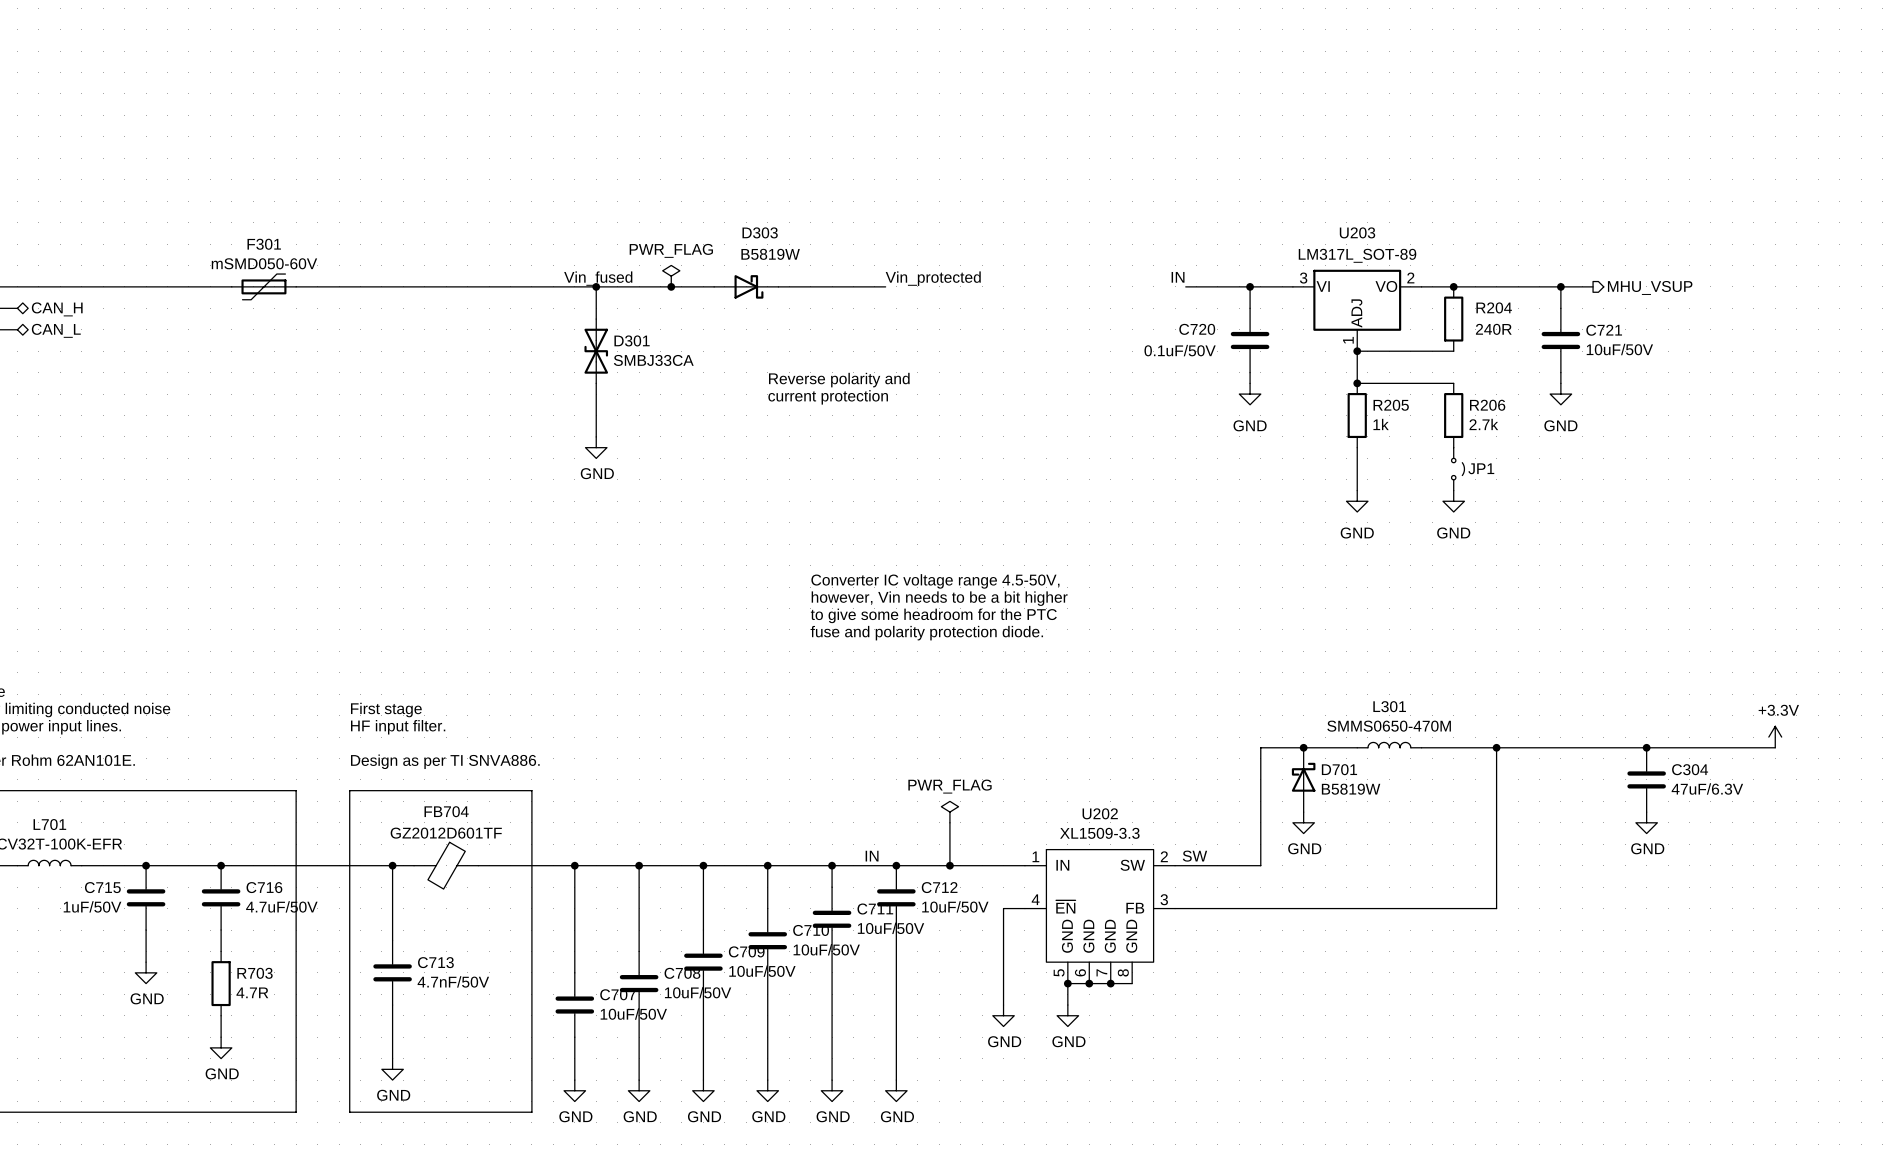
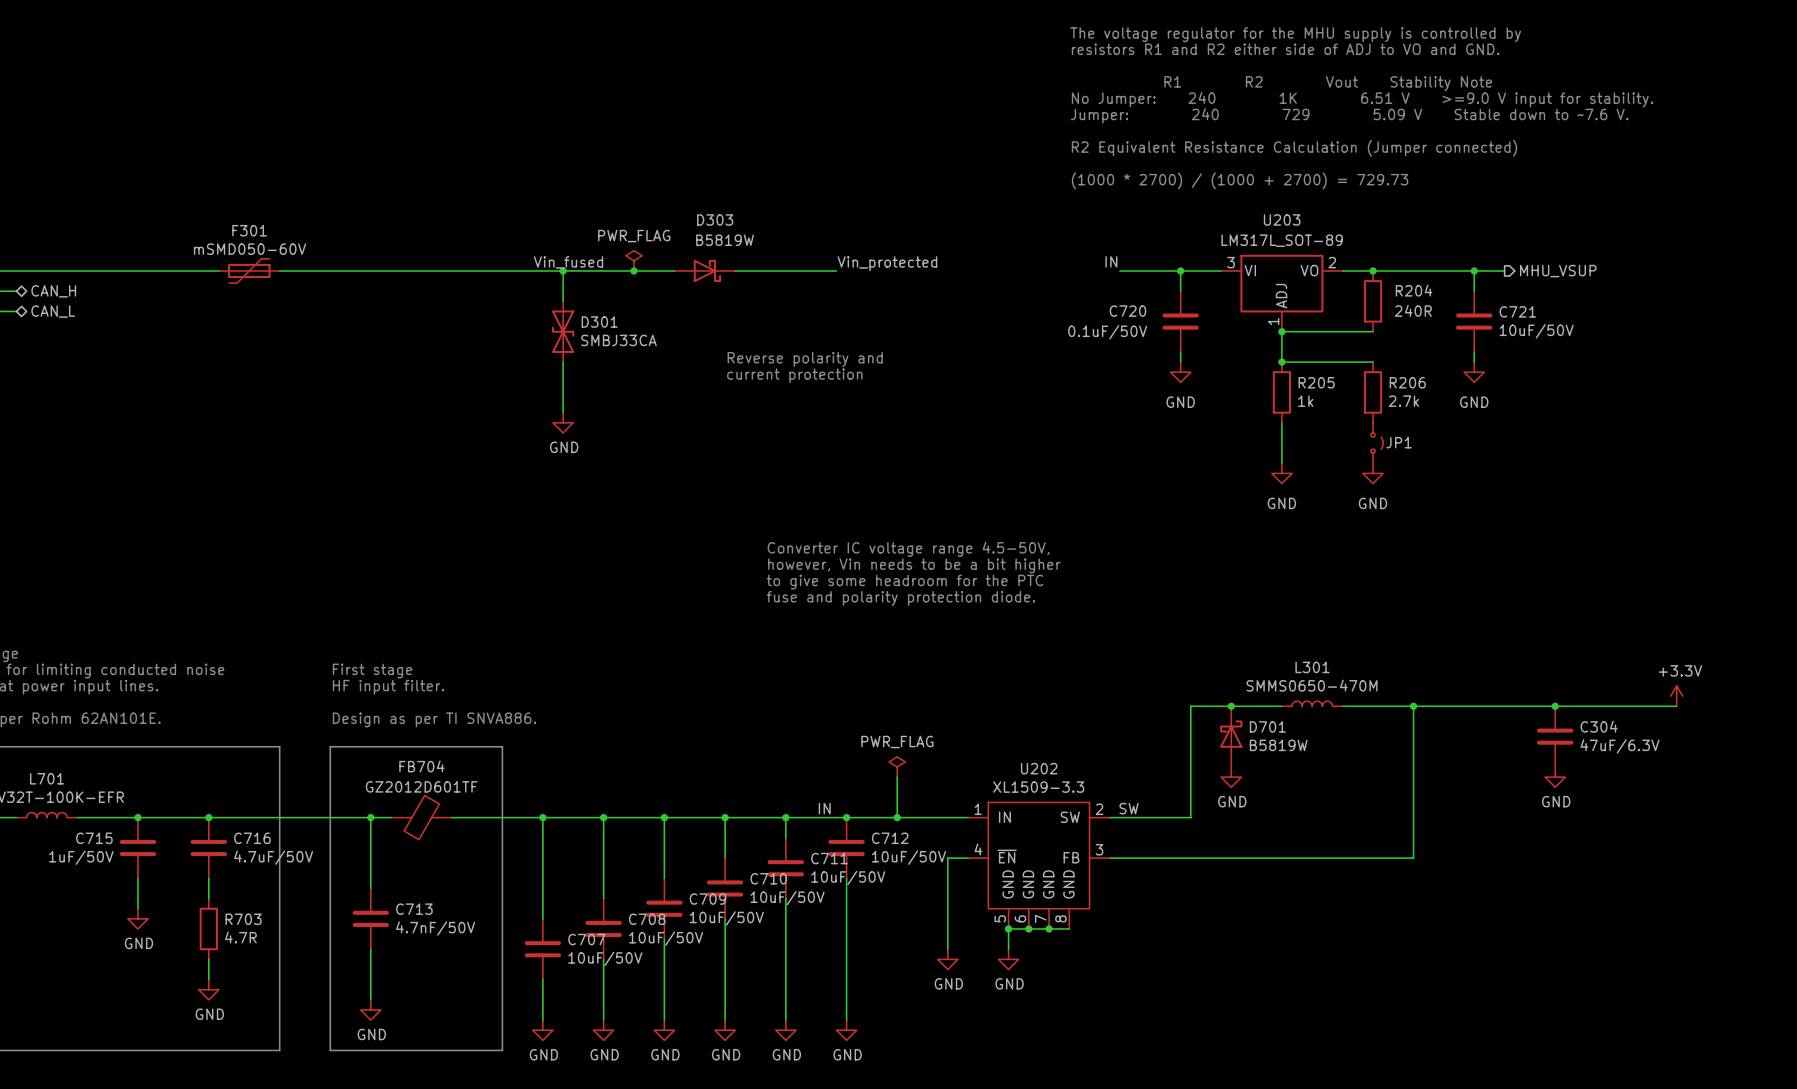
text: none -> The voltage regulator for the MHU supply is controlled by (1295, 34)
text: none -> resistors R1 and R2 either side of ADJ to VO and GND. (1285, 49)
text: none -> R1 R2 Vout Stability Note (1328, 83)
text: none -> No Jumper: 240 1K 6.51 V >=9.0 V input for stability. (1362, 99)
text: none -> Jumper: 240 729 5.09 V Stable down to ~7.6 V. (1349, 115)
text: none -> R2 Equivalent Resistance Calculation (Jumper connected) (1294, 148)
text: none -> (1000 * 2700) / (1000 + 2700) = 729.73 (1240, 180)

